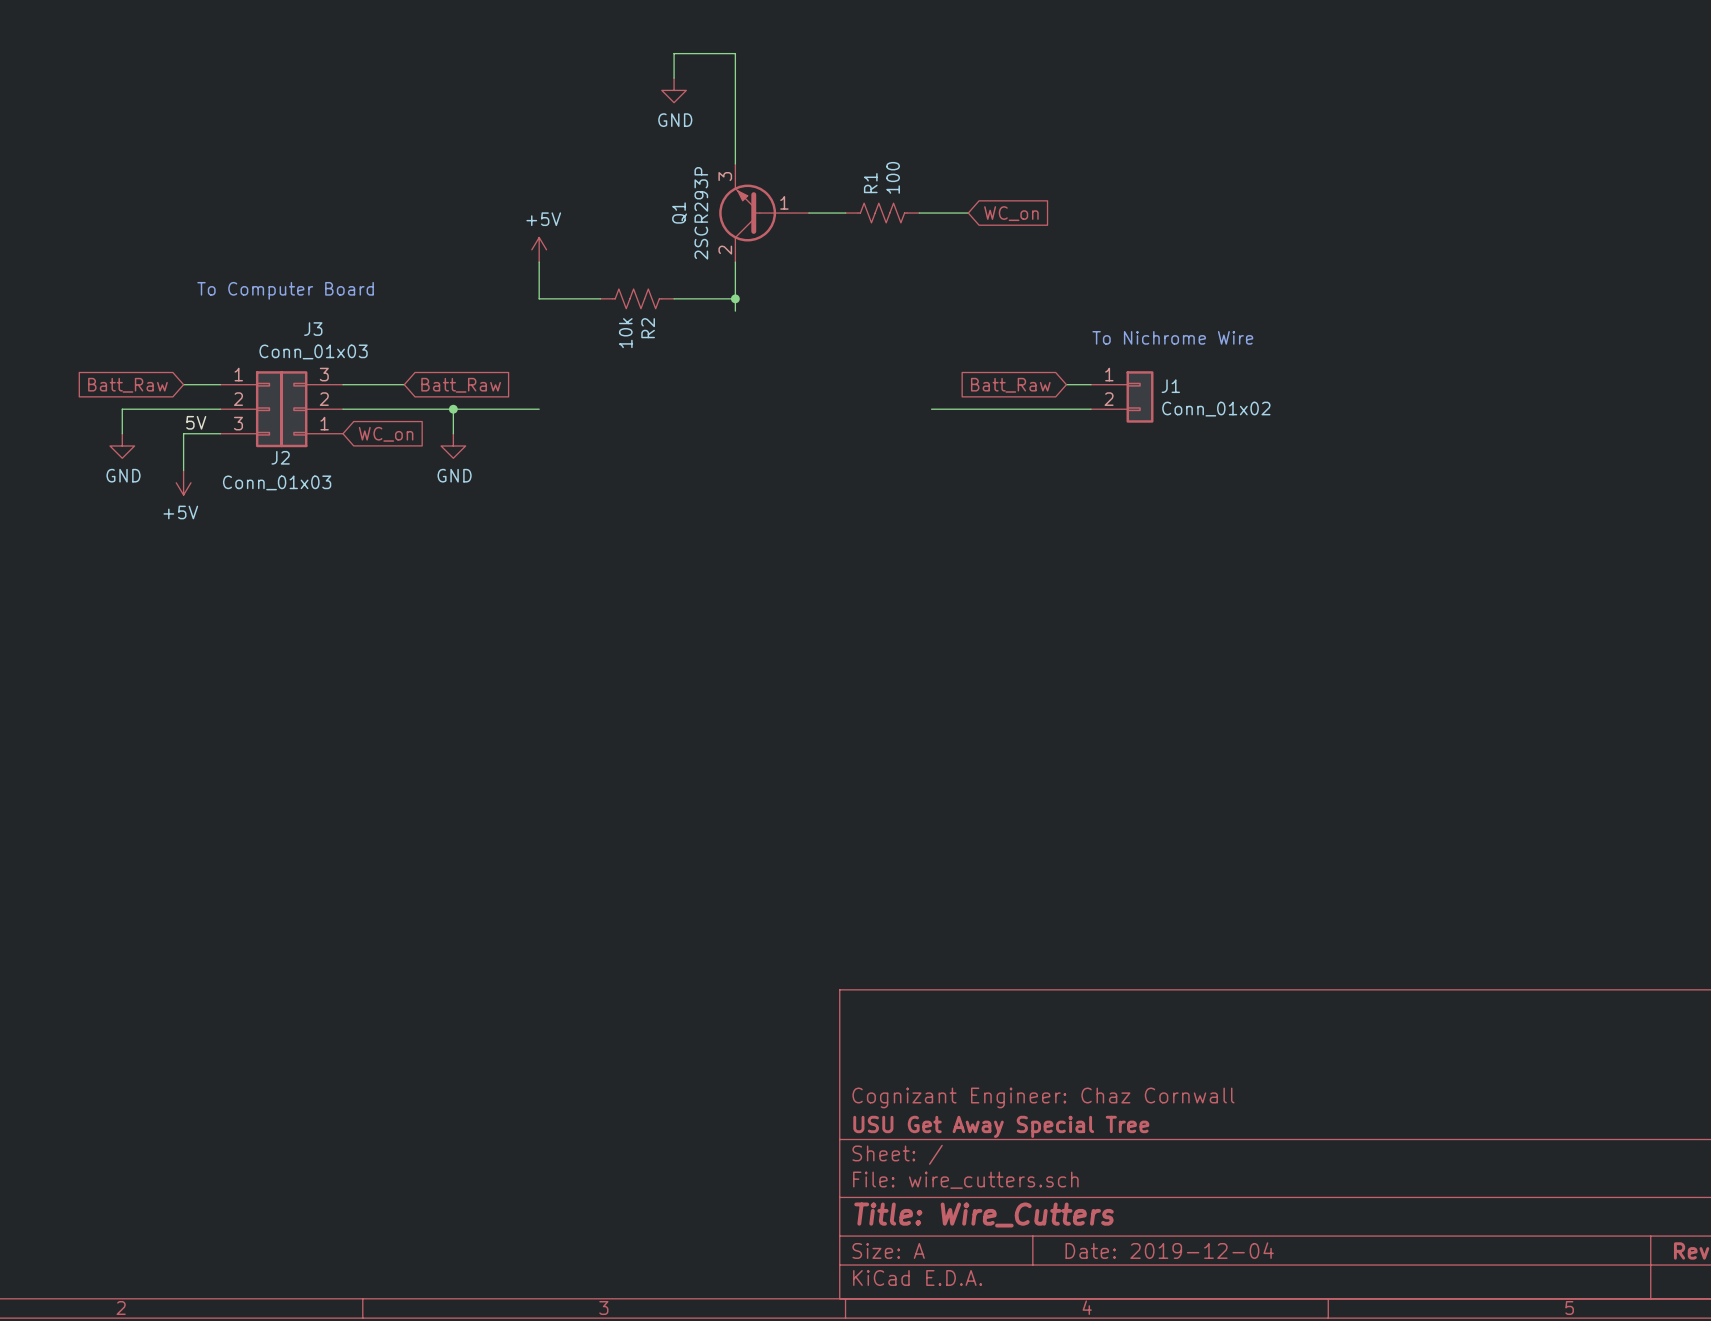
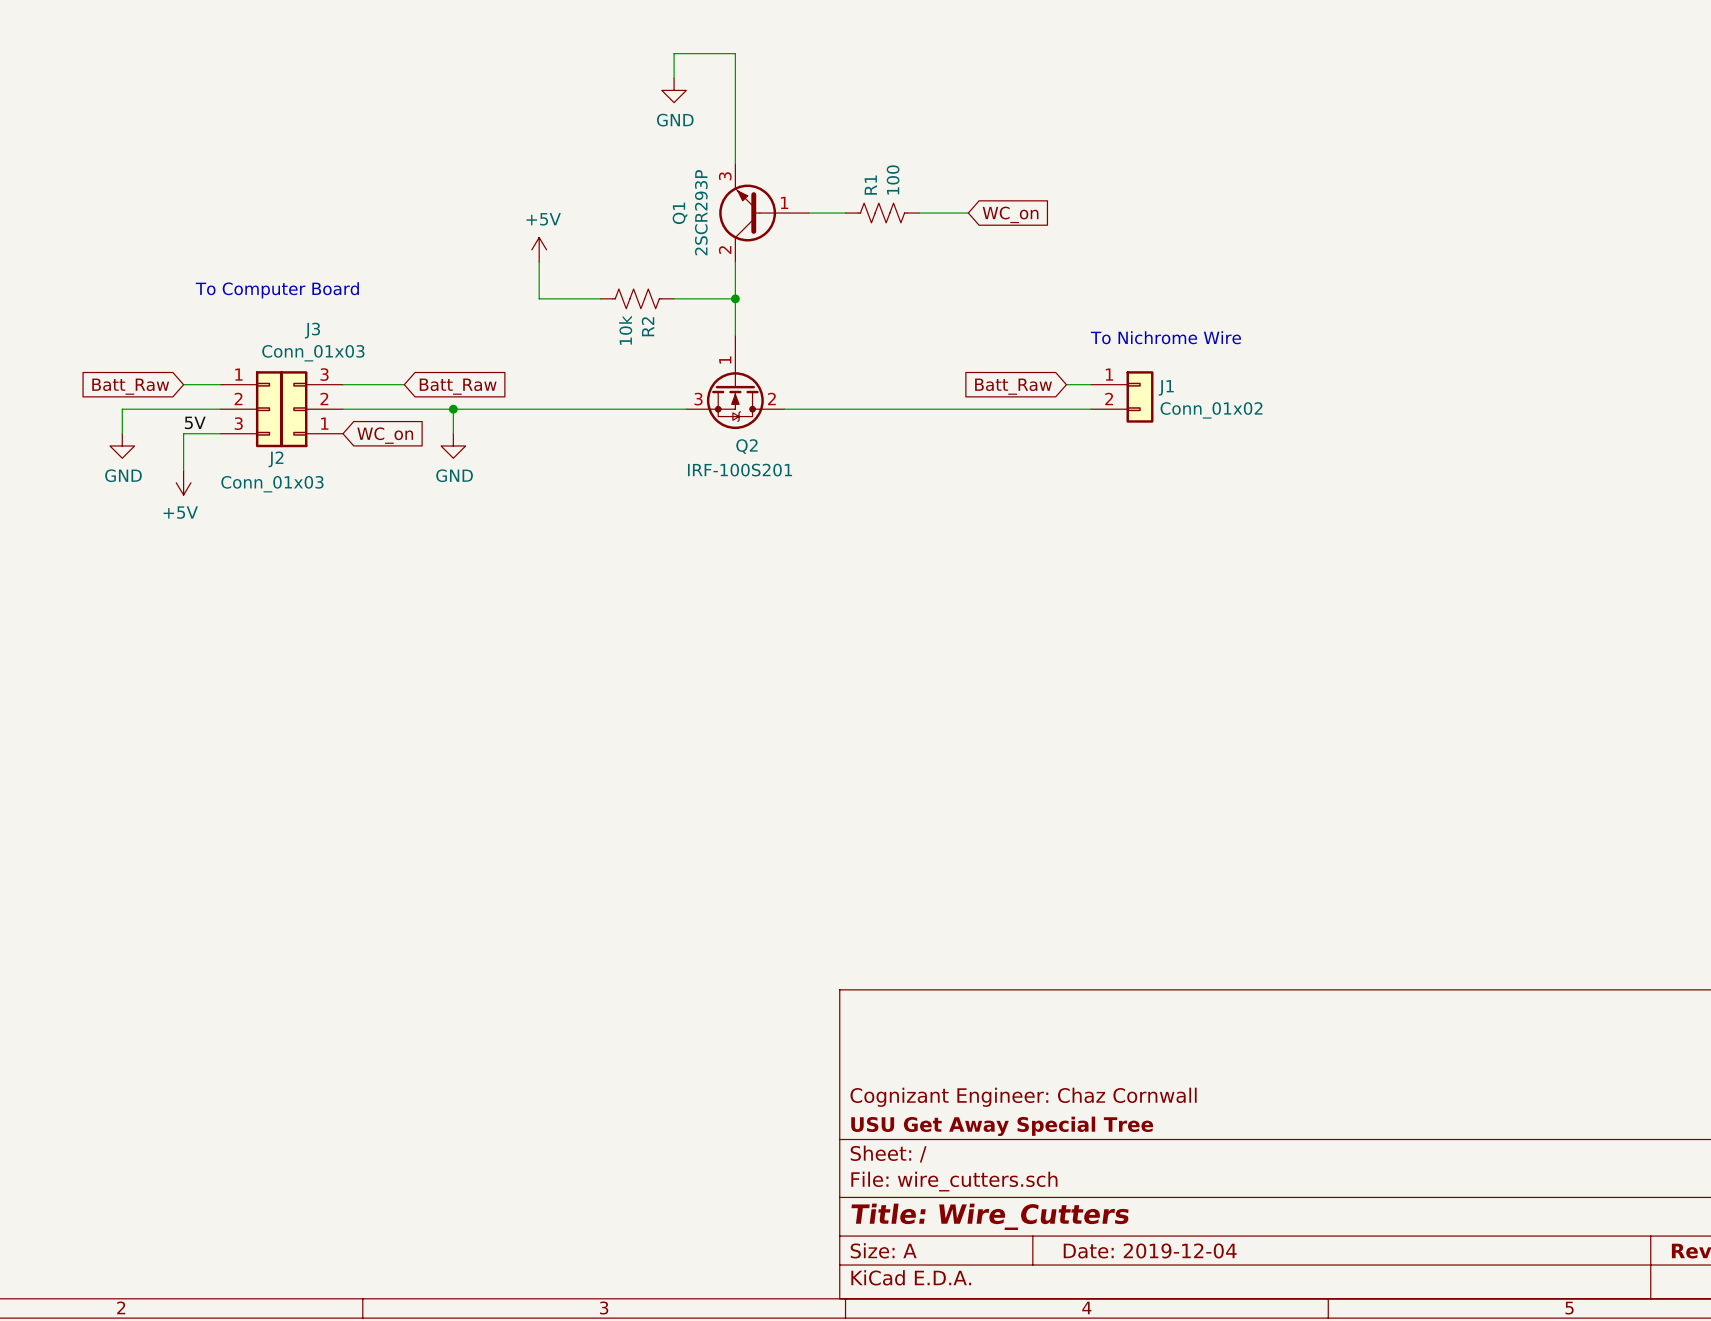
wire: none -> (735, 311) (735, 335)
Q2: none -> IRF-100S201 (735, 382)
wire: none -> (539, 409) (686, 409)
wire: none -> (784, 409) (931, 409)

